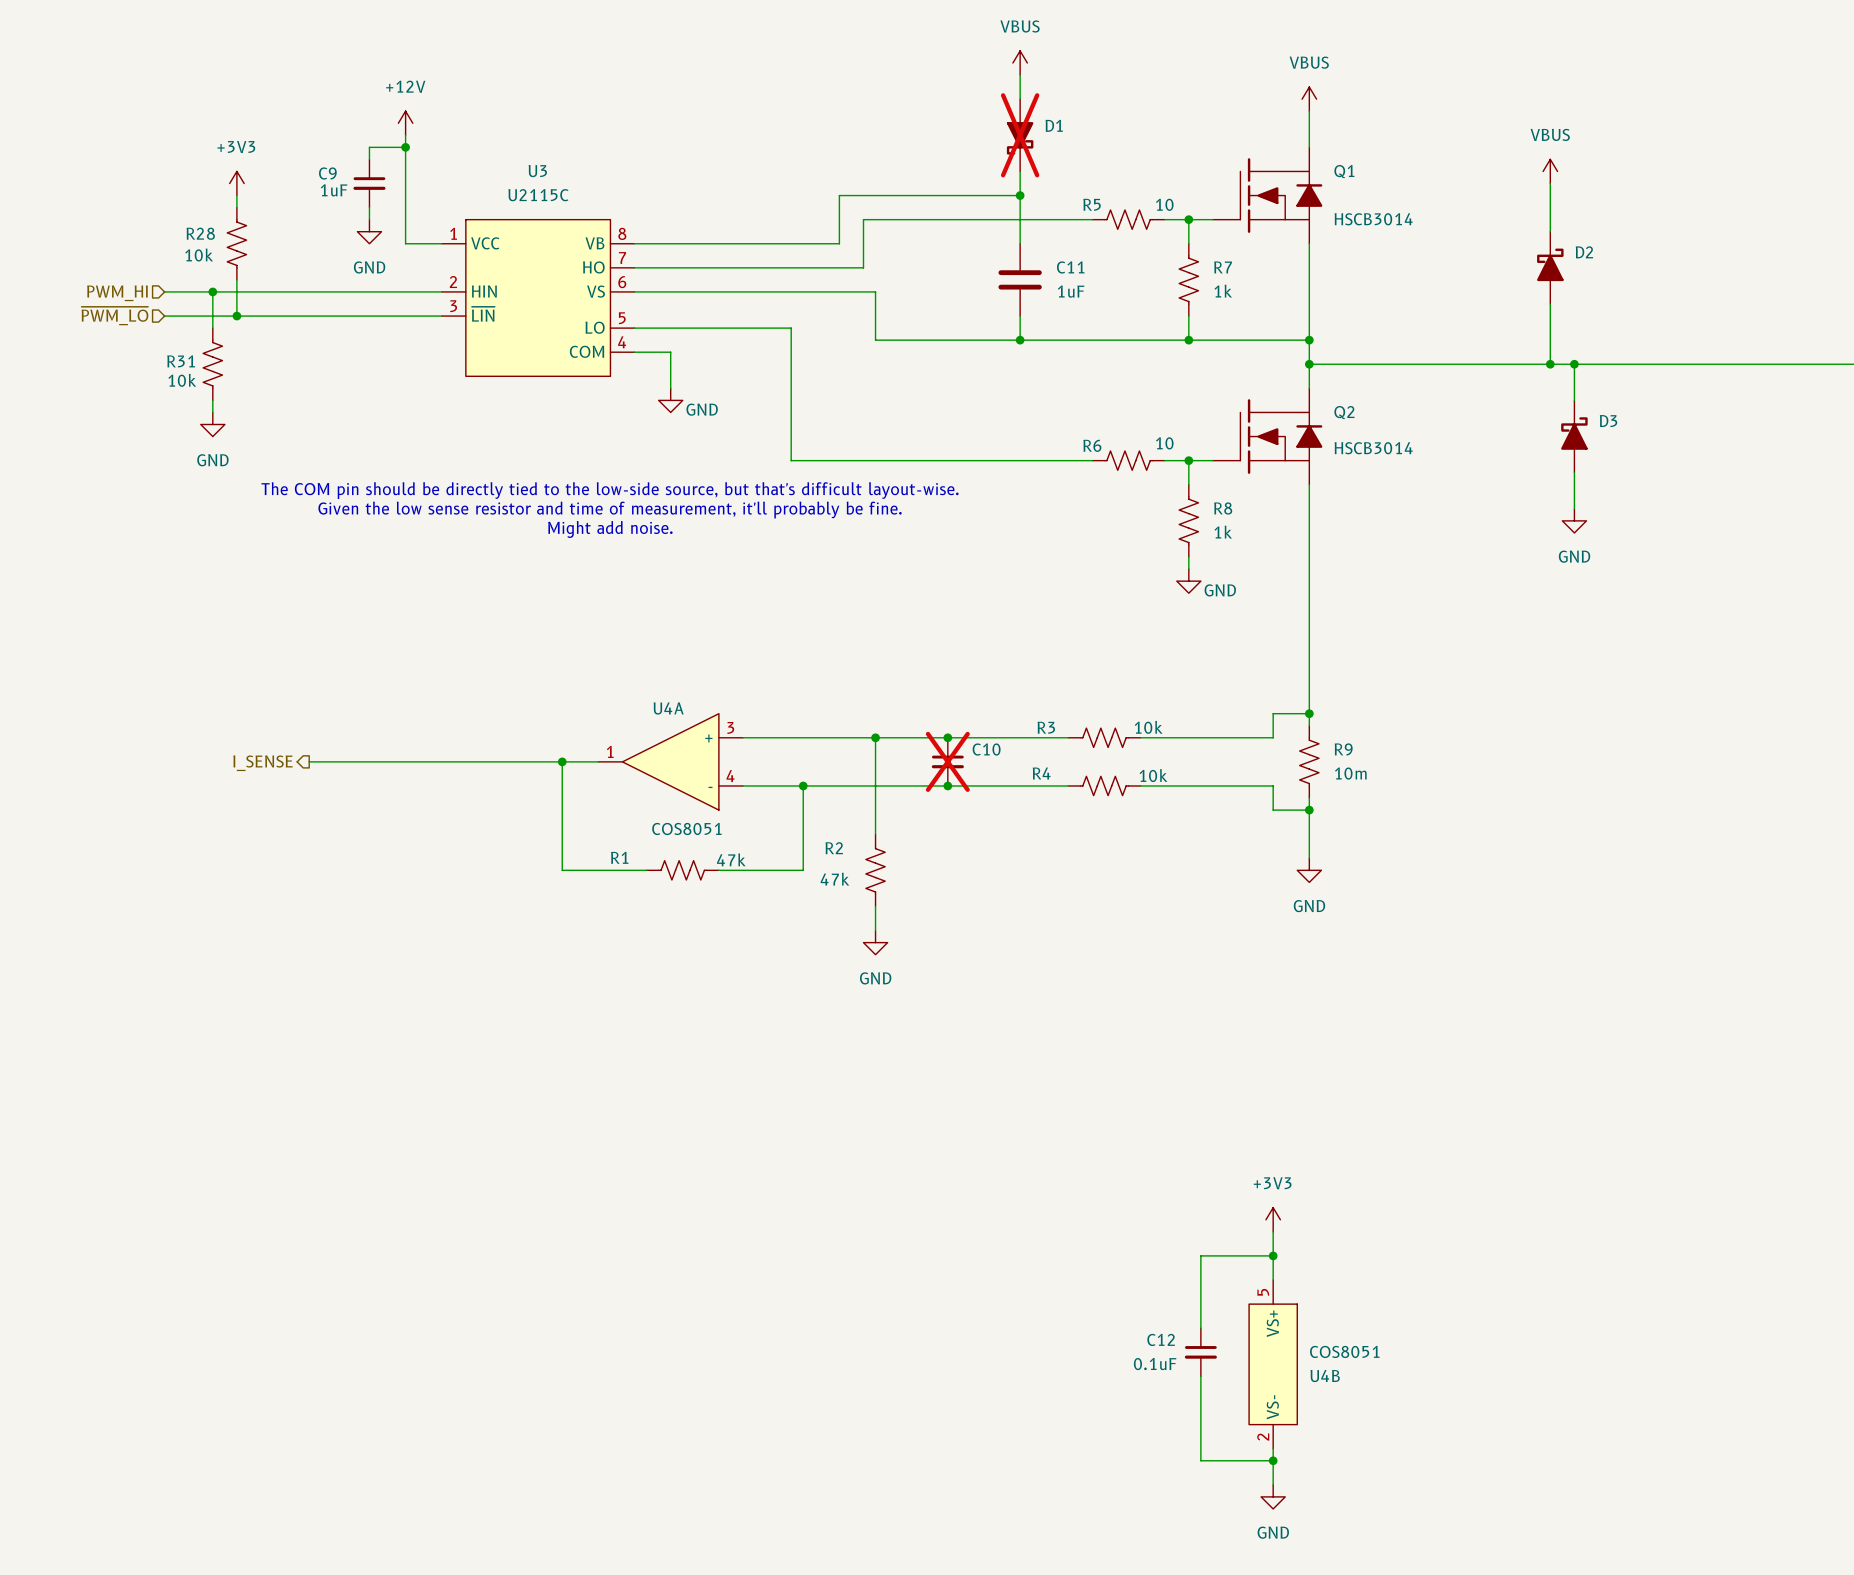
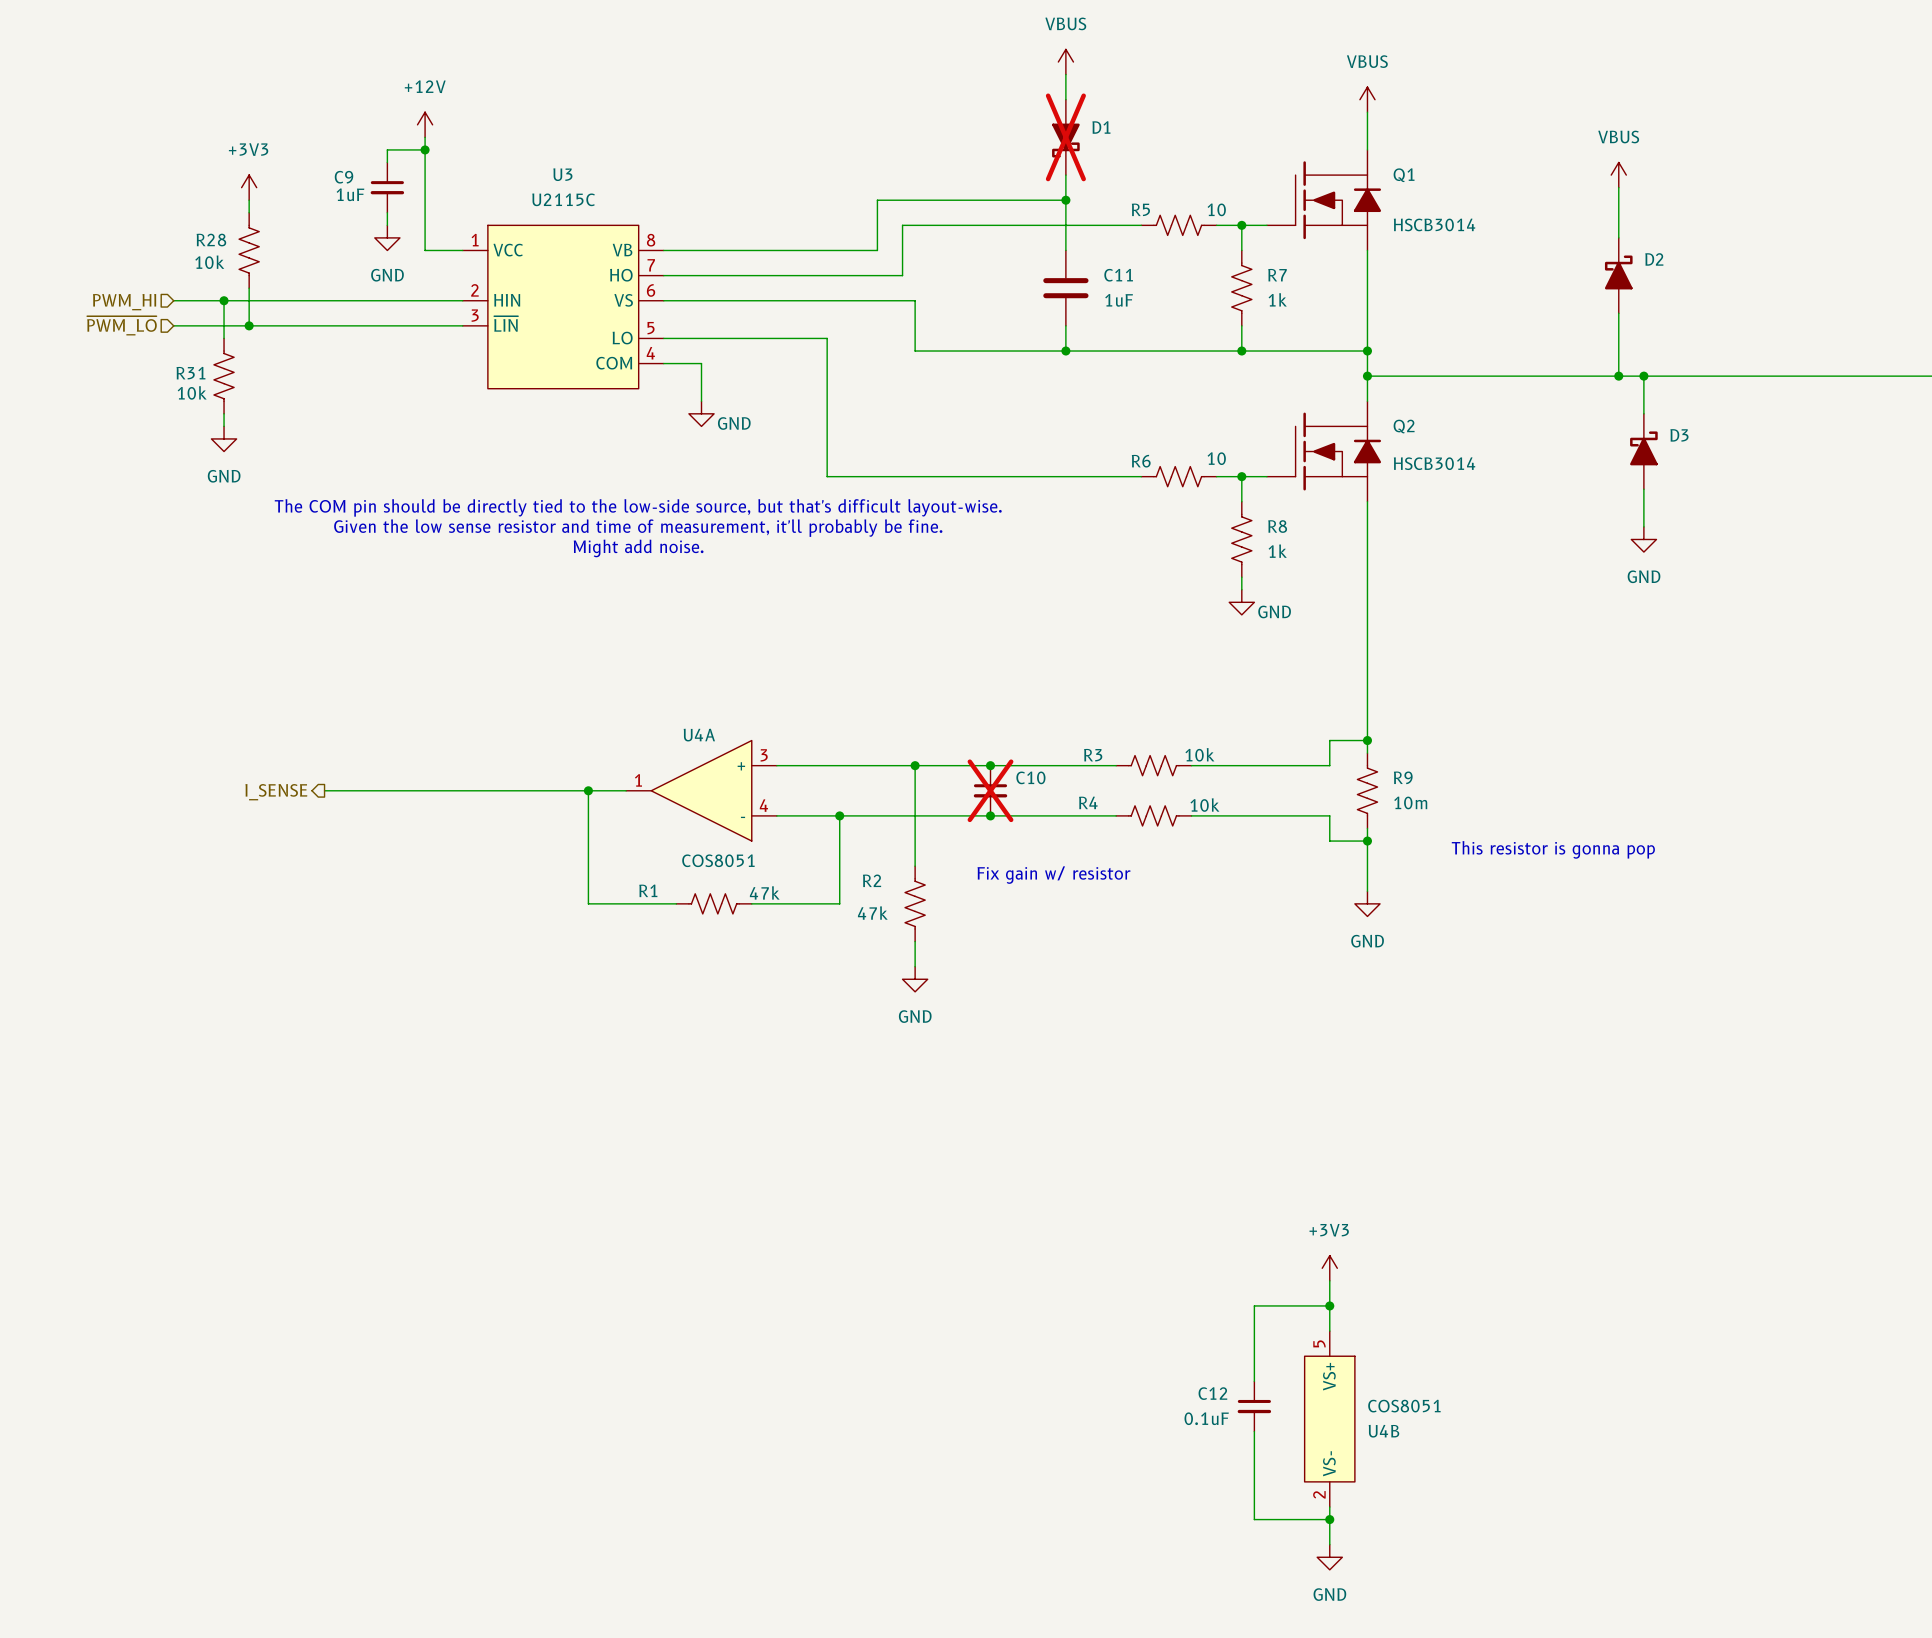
text: none -> This resistor is gonna pop (1553, 849)
text: none -> Fix gain w/ resistor (1053, 875)

